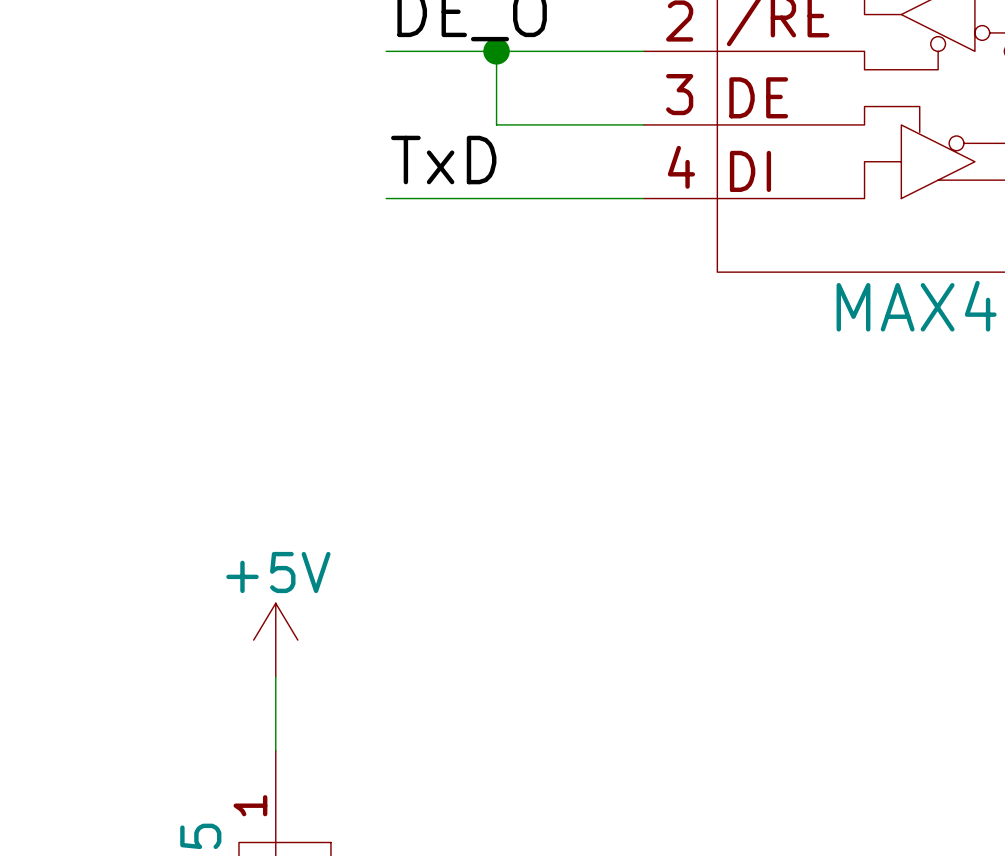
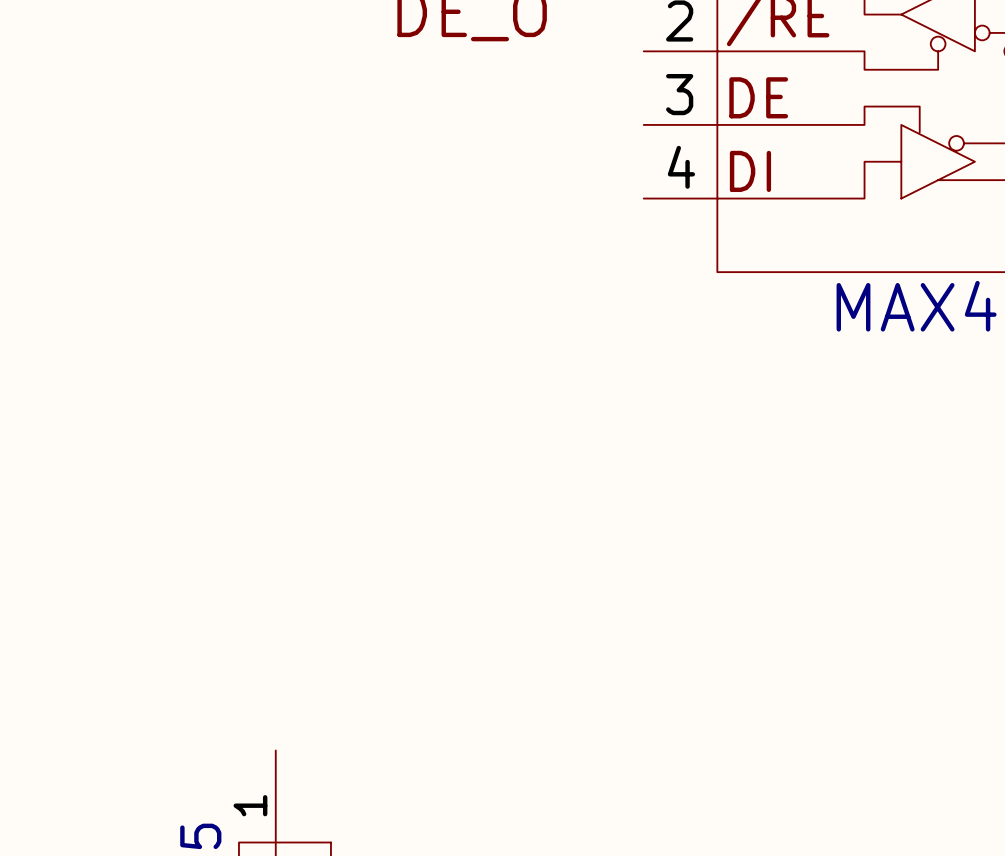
wire: (386, 51) (643, 51) -> none
wire: (496, 51) (496, 124) (643, 124) -> none
junction: (496, 51) -> none
label: TxD (443, 160) -> none
wire: (386, 198) (643, 198) -> none
power symbol: +5V (275, 640) -> none
wire: (275, 676) (275, 750) -> none

